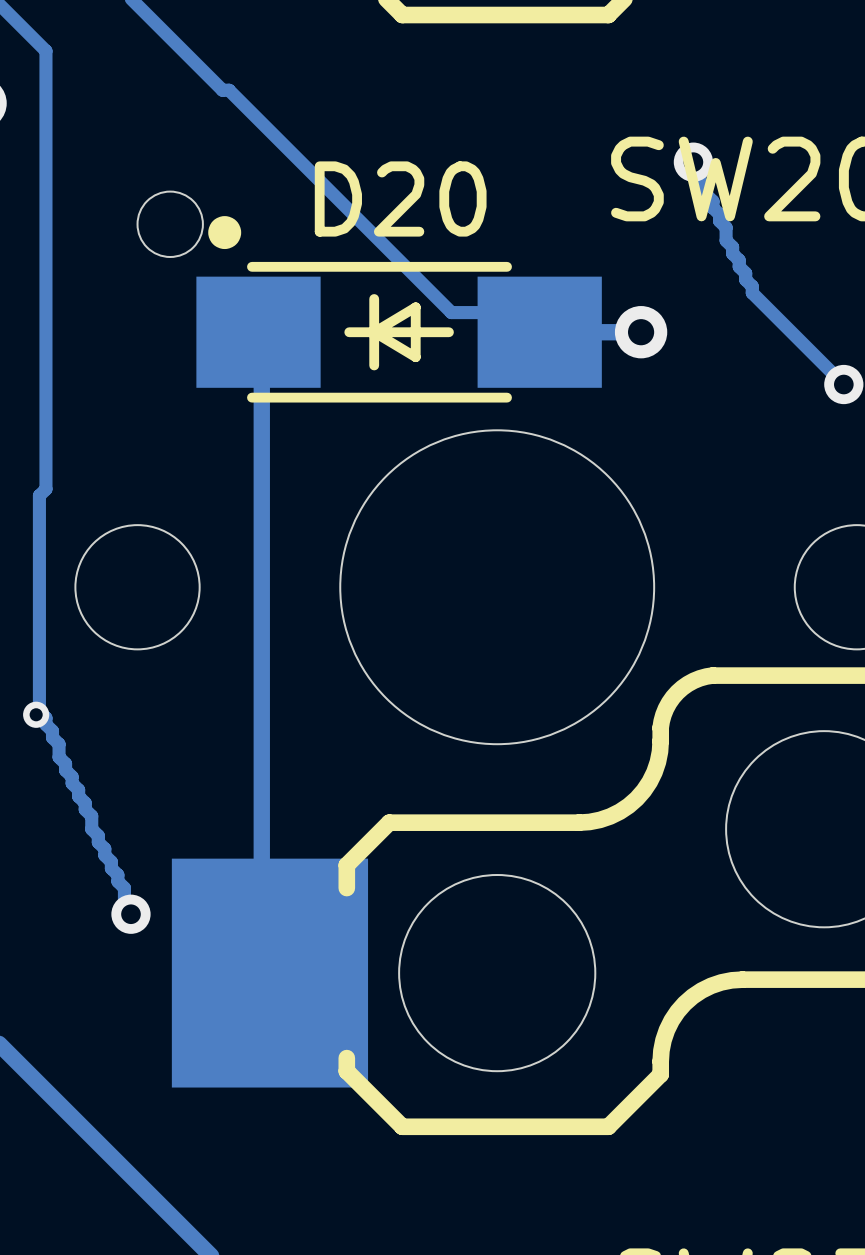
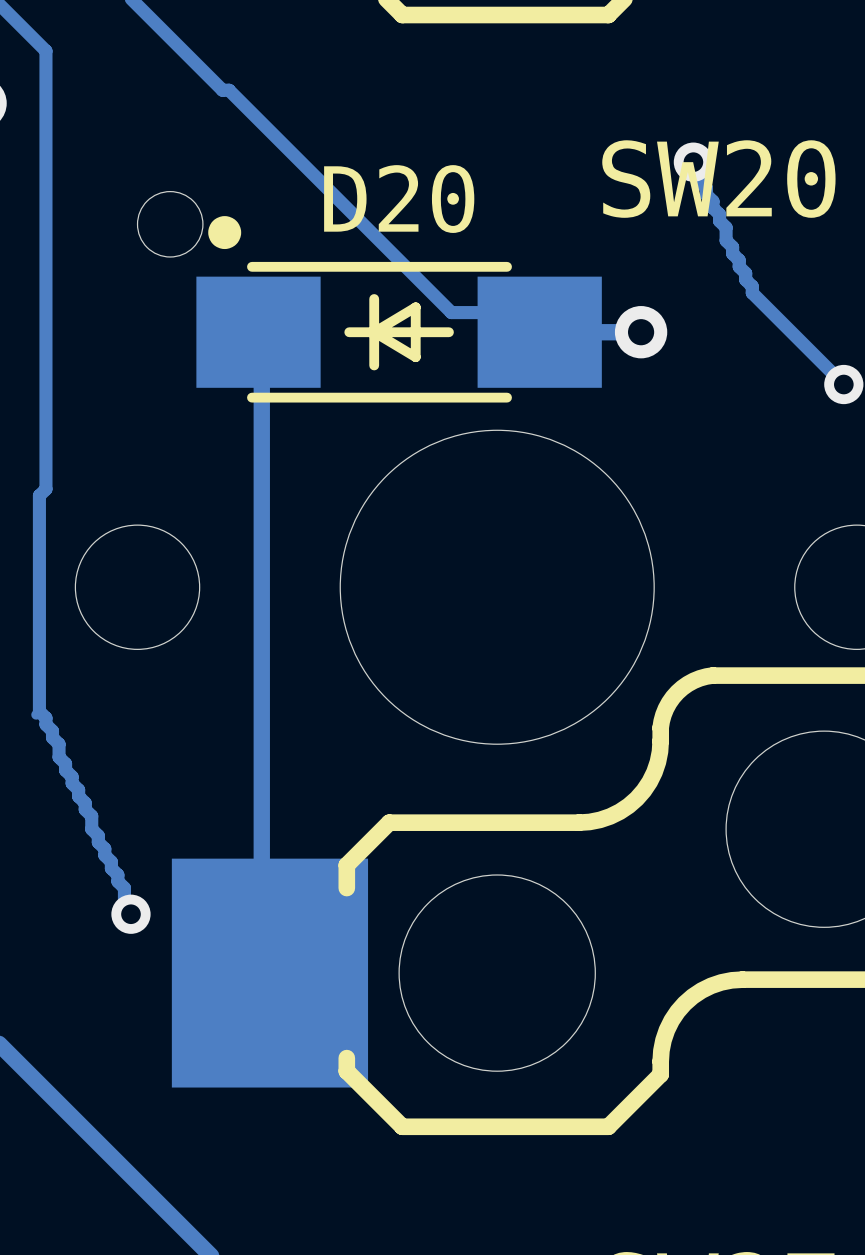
via: (36, 714) -> none

